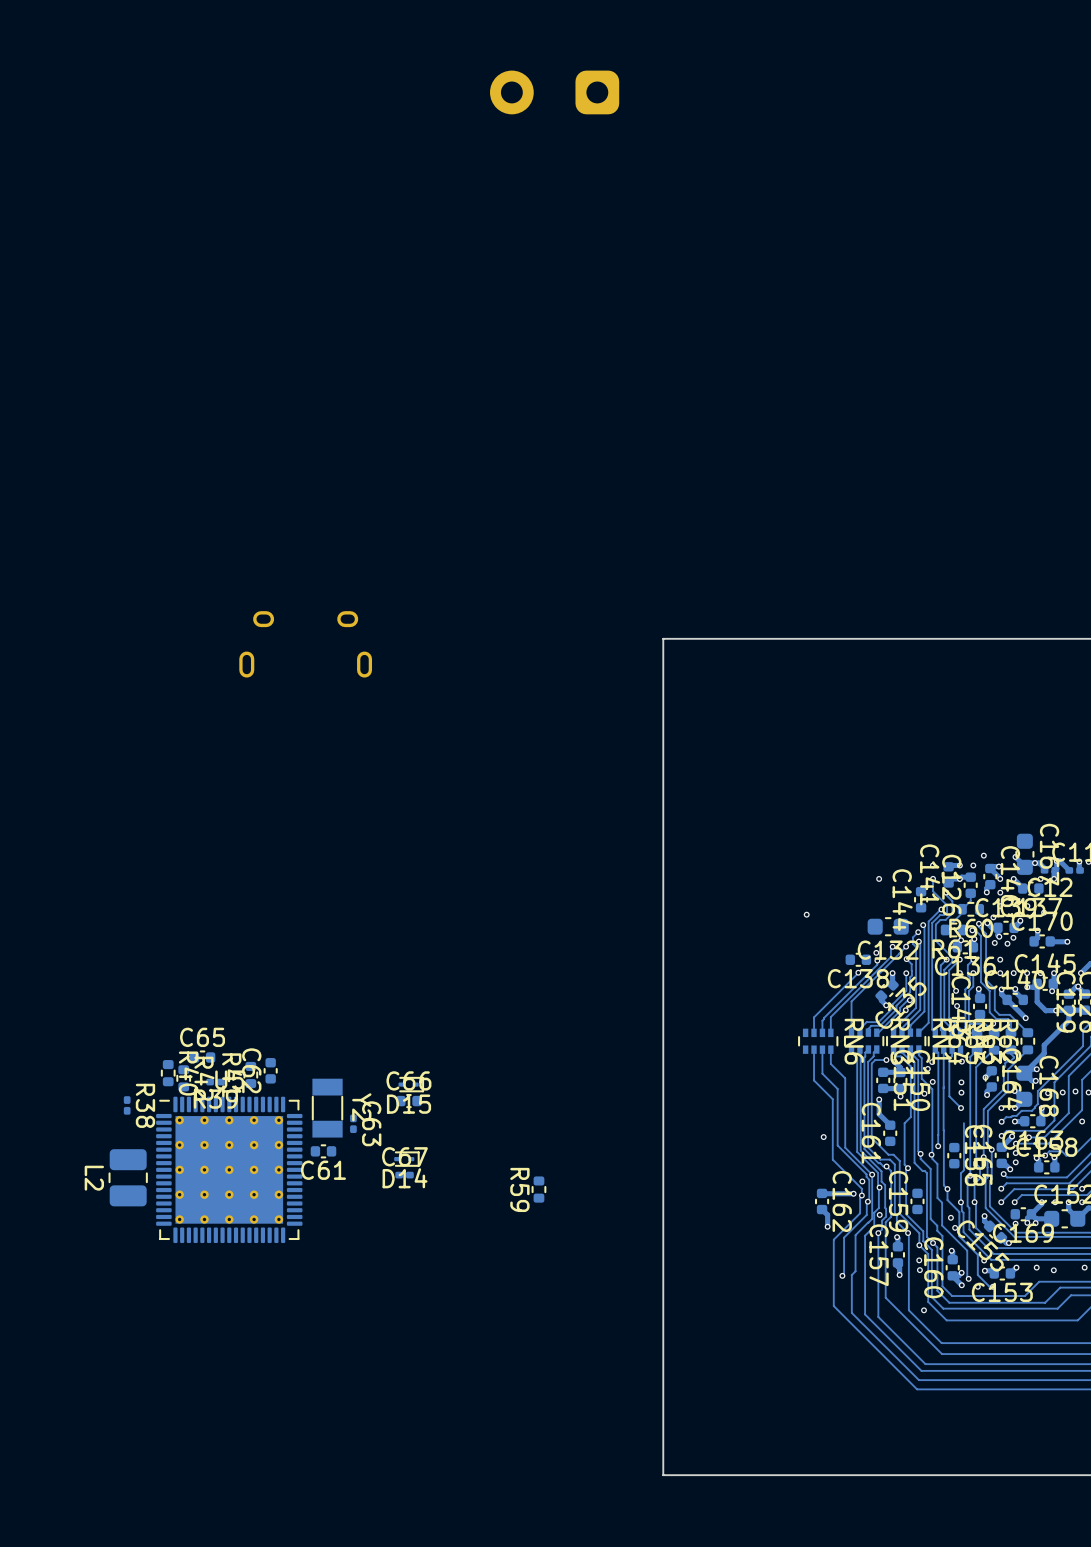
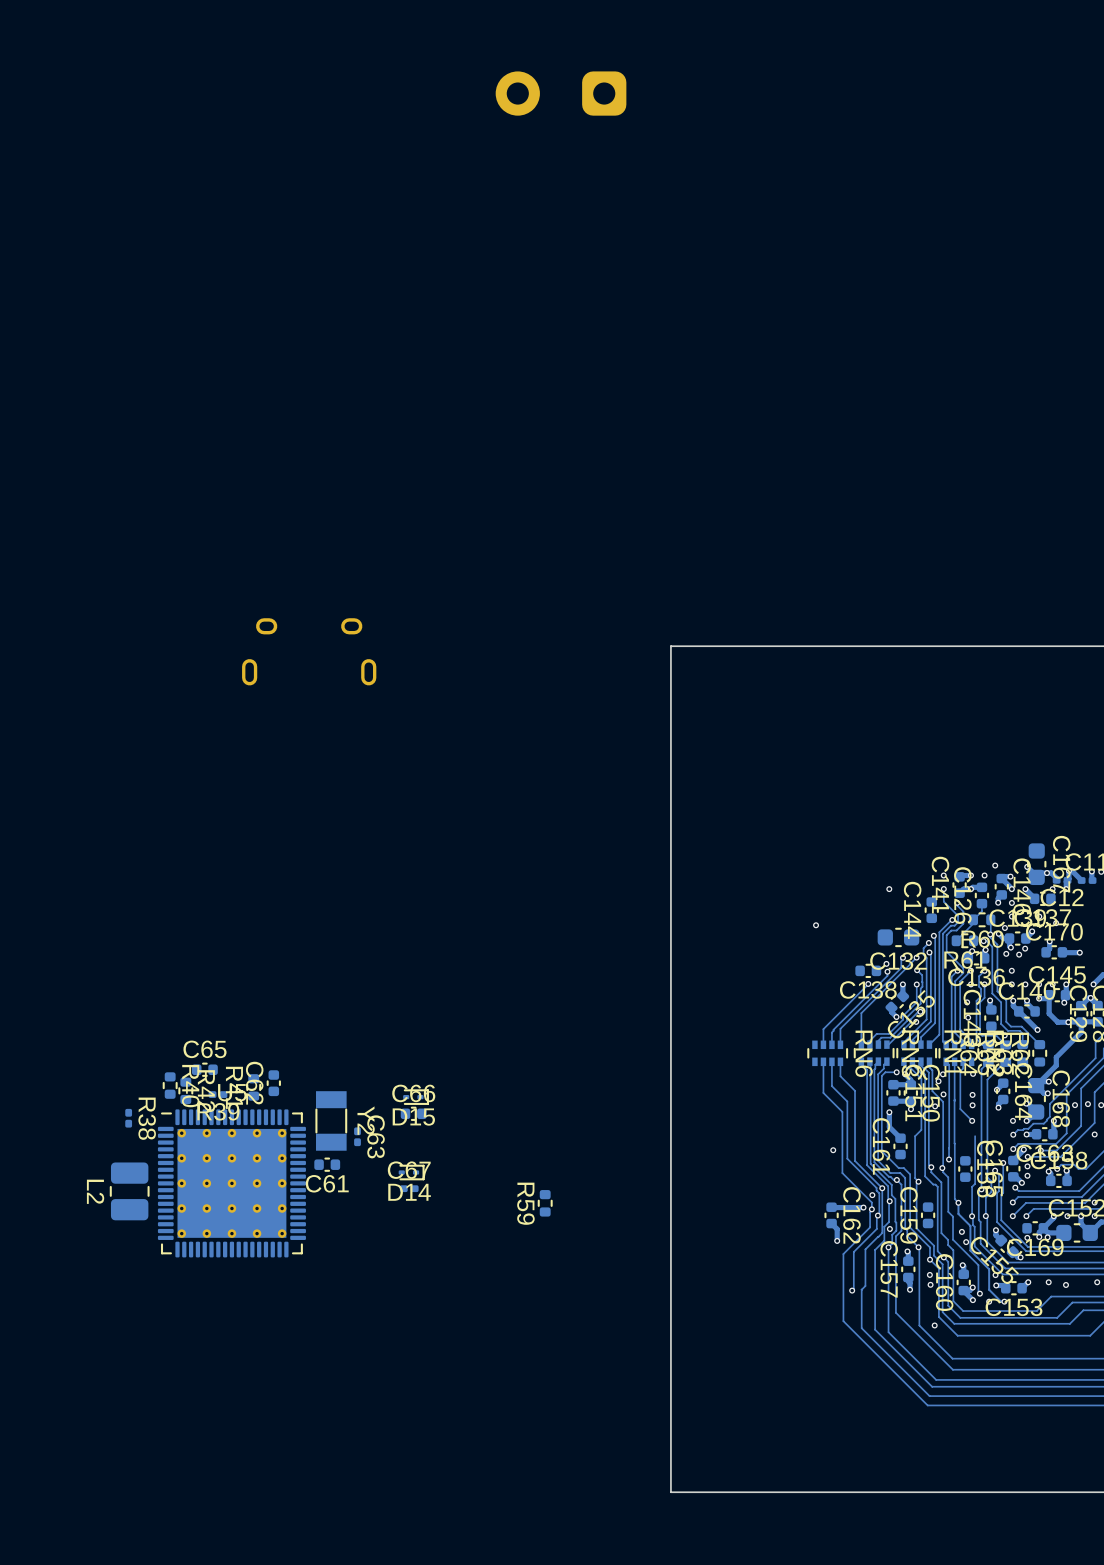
track: none -> (990, 919) (990, 933)
track: (1011, 1049) (1013, 1057) (1005, 1063) (1003, 1089) (983, 1109) (983, 1157) -> none
track: (1027, 1049) (1008, 1069) (1008, 1090) (987, 1110) (987, 1145) (991, 1149) -> none

